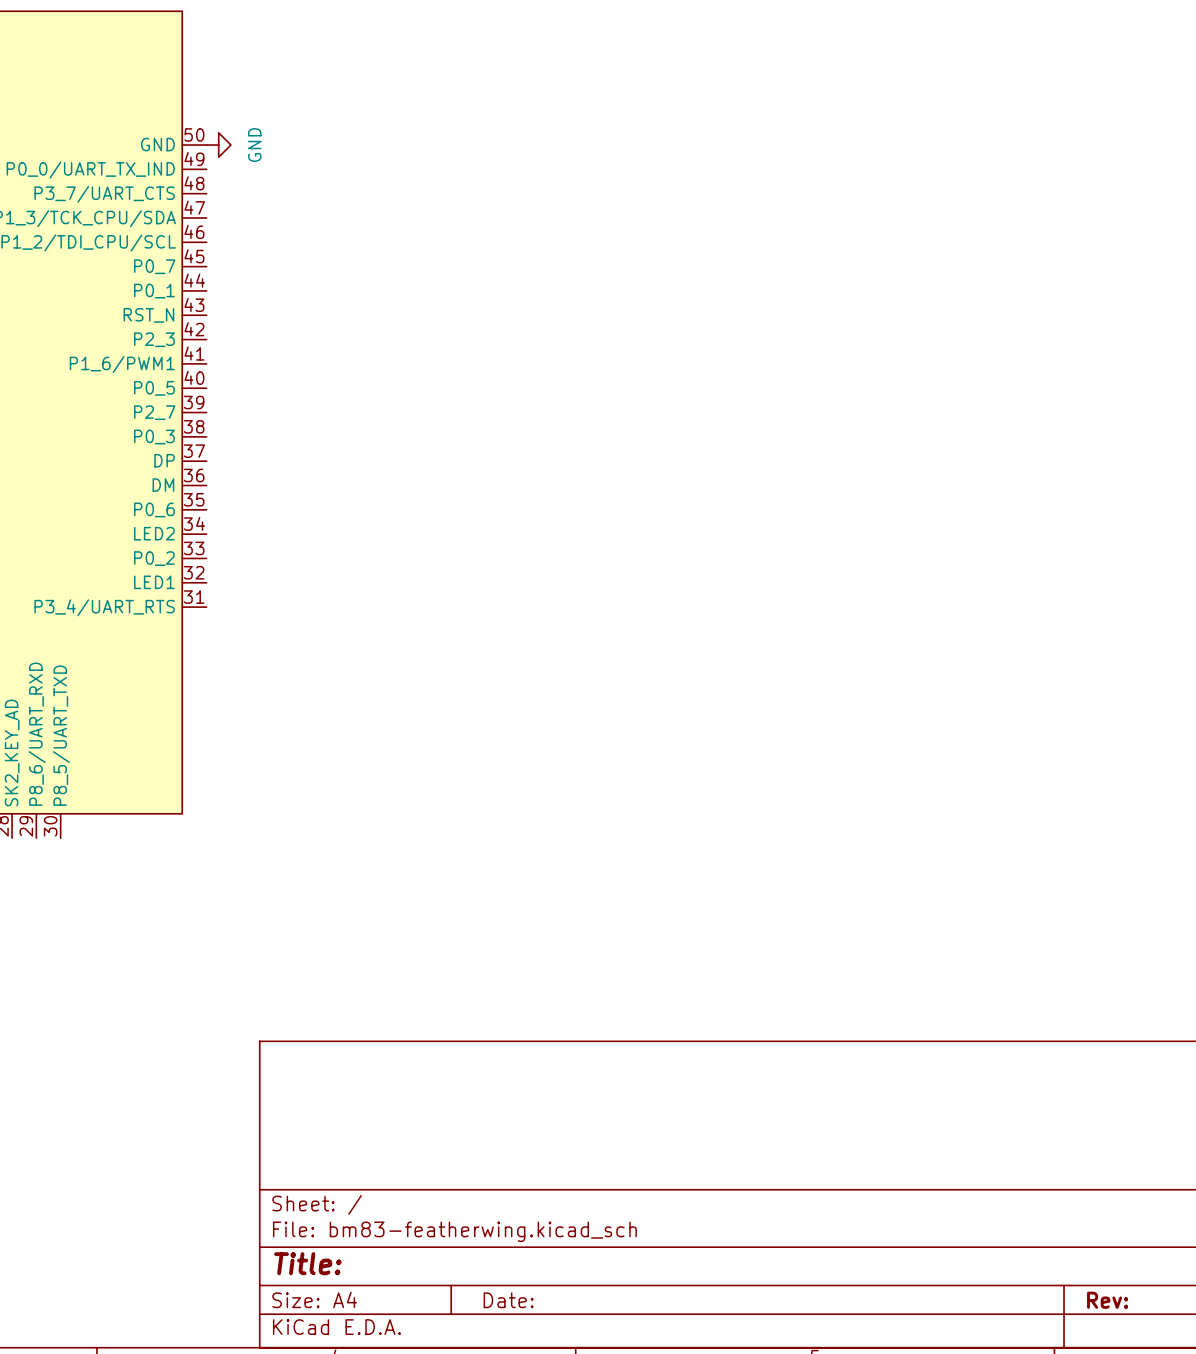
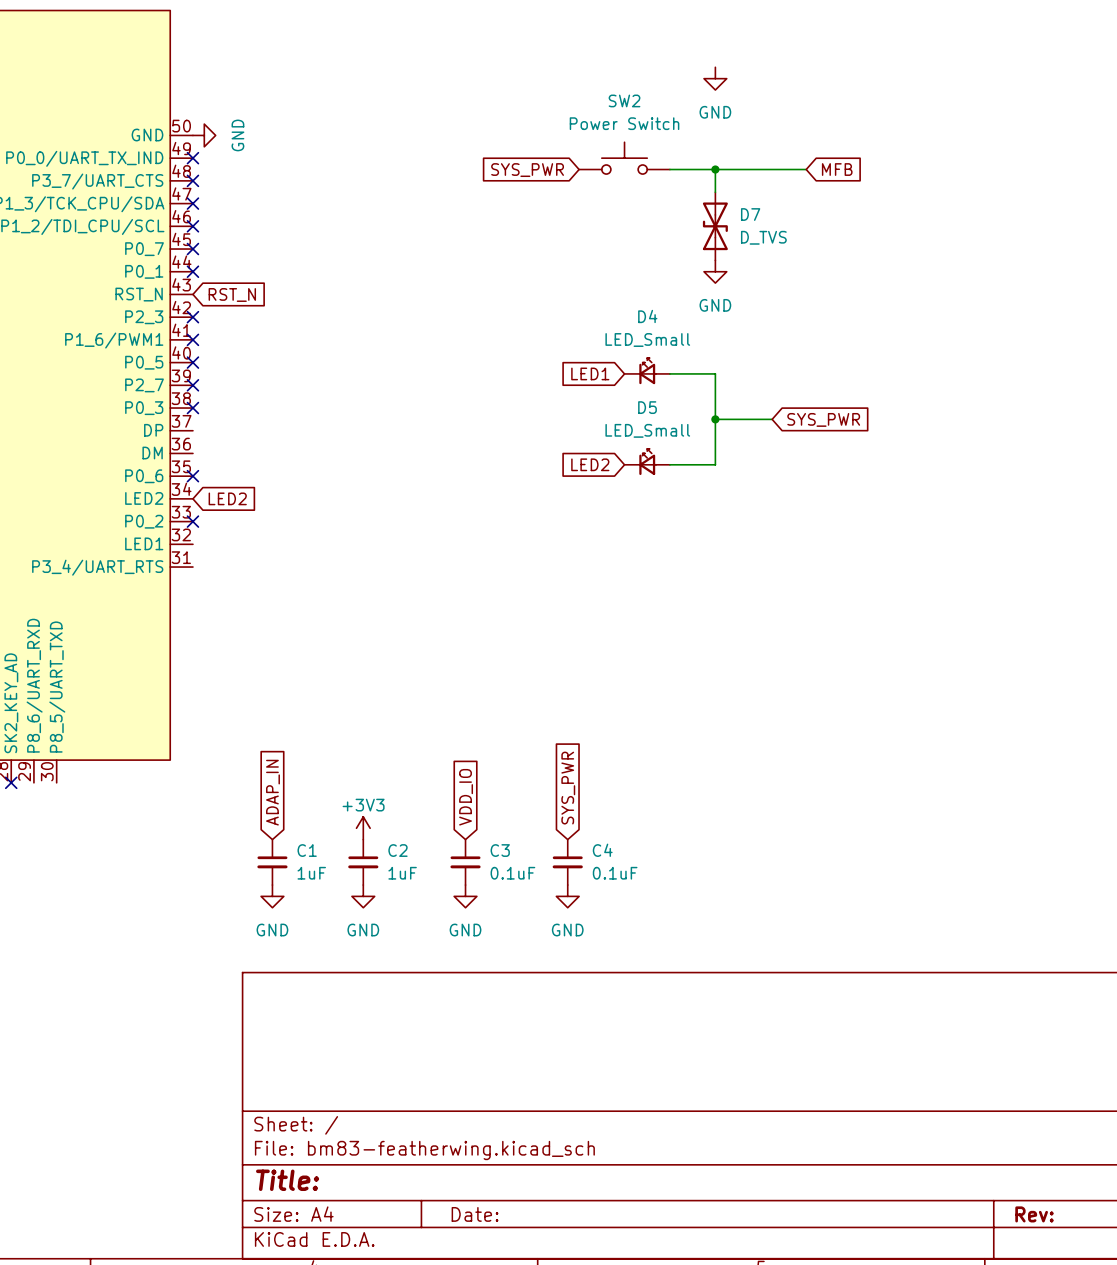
power symbol: none -> GND (715, 78)
no-connect mark: none -> (192, 158)
SW2: none -> Power Switch (624, 158)
wire: none -> (669, 169) (806, 169)
wire: none -> (715, 169) (715, 192)
junction: none -> (715, 169)
global label: none -> MFB (837, 169)
global label: none -> SYS_PWR (527, 170)
no-connect mark: none -> (192, 180)
no-connect mark: none -> (192, 203)
no-connect mark: none -> (192, 226)
D7: none -> D_TVS (715, 226)
no-connect mark: none -> (192, 249)
no-connect mark: none -> (192, 271)
power symbol: none -> GND (715, 271)
global label: none -> RST_N (232, 294)
no-connect mark: none -> (192, 317)
no-connect mark: none -> (192, 339)
no-connect mark: none -> (192, 362)
D4: none -> LED_Small (647, 371)
global label: none -> LED1 (590, 373)
wire: none -> (669, 373) (715, 373) (715, 464) (669, 464)
no-connect mark: none -> (192, 385)
no-connect mark: none -> (192, 408)
wire: none -> (715, 419) (772, 419)
junction: none -> (715, 419)
global label: none -> SYS_PWR (823, 419)
D5: none -> LED_Small (647, 461)
global label: none -> LED2 (590, 464)
no-connect mark: none -> (192, 476)
global label: none -> LED2 (227, 498)
no-connect mark: none -> (192, 521)
no-connect mark: none -> (11, 782)
global label: none -> SYS_PWR (568, 788)
global label: none -> ADAP_IN (272, 792)
global label: none -> VDD_IO (466, 797)
power symbol: none -> +3V3 (363, 828)
C1: none -> 1uF (272, 862)
C2: none -> 1uF (363, 862)
C3: none -> 0.1uF (465, 862)
C4: none -> 0.1uF (567, 862)
power symbol: none -> GND (272, 896)
power symbol: none -> GND (363, 896)
power symbol: none -> GND (465, 896)
power symbol: none -> GND (567, 896)

